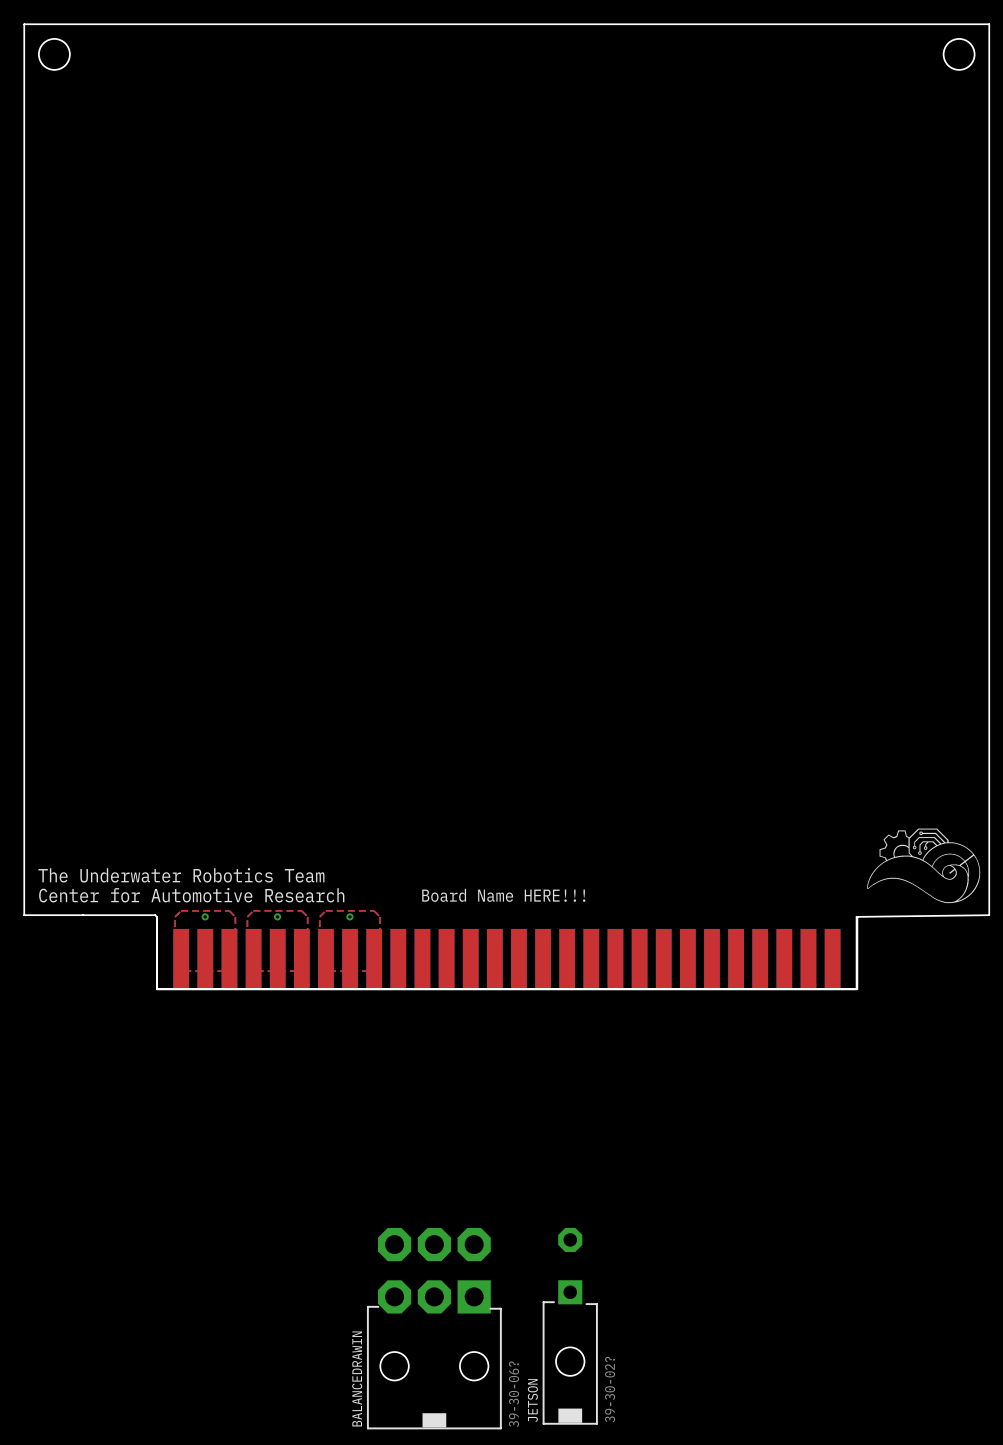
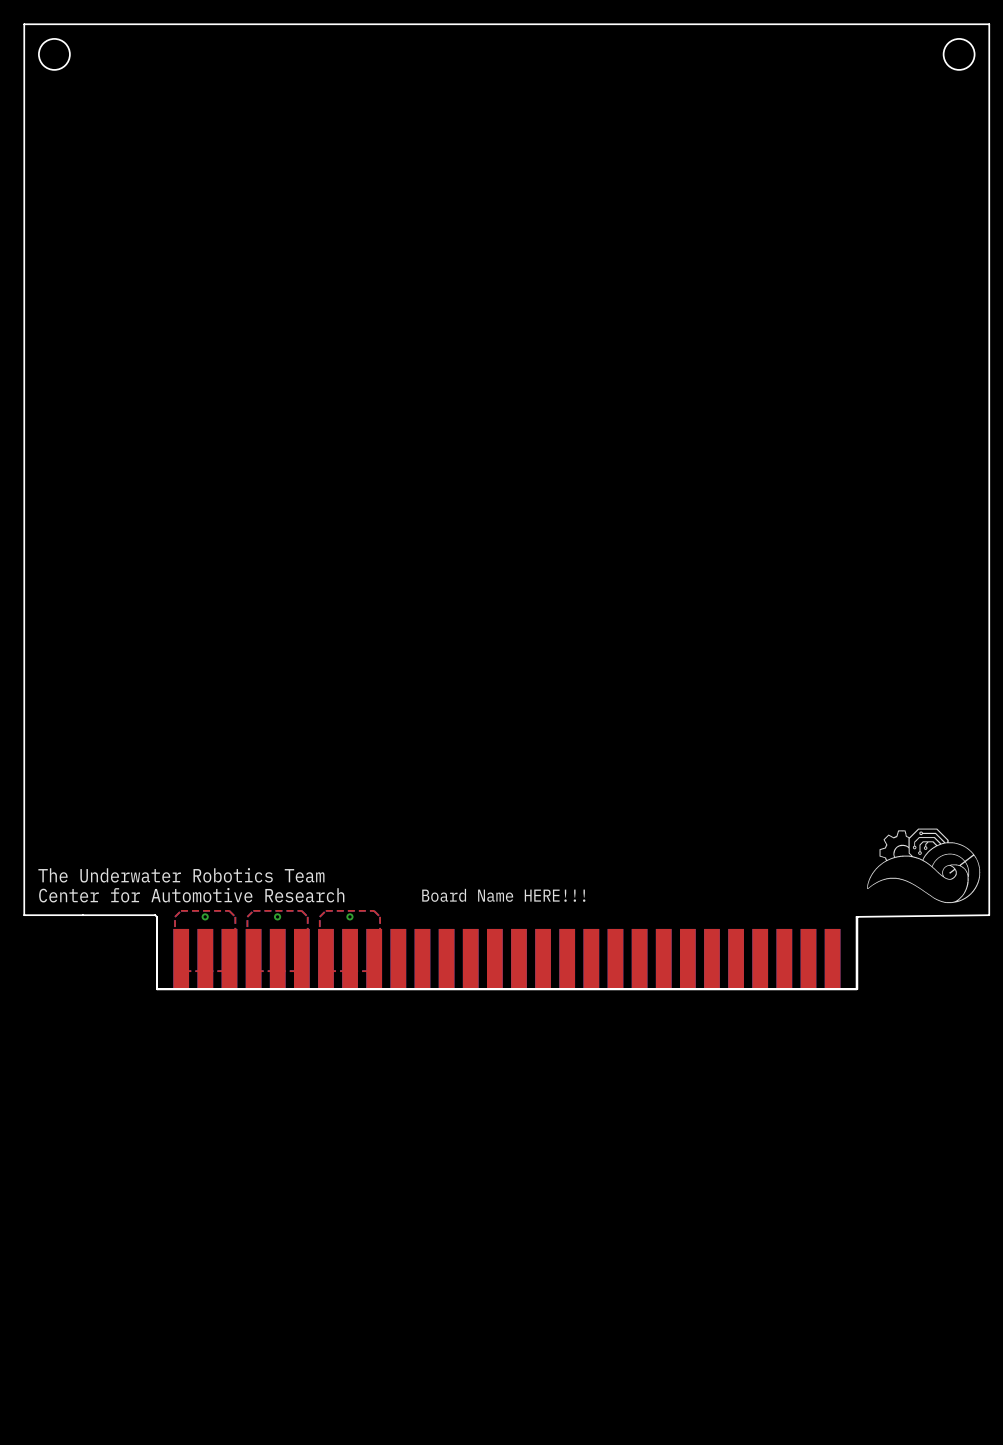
JETSON: 39-30-02? (570, 1326) -> none
BALANCEDRAWIN: 39-30-06? (434, 1328) -> none

